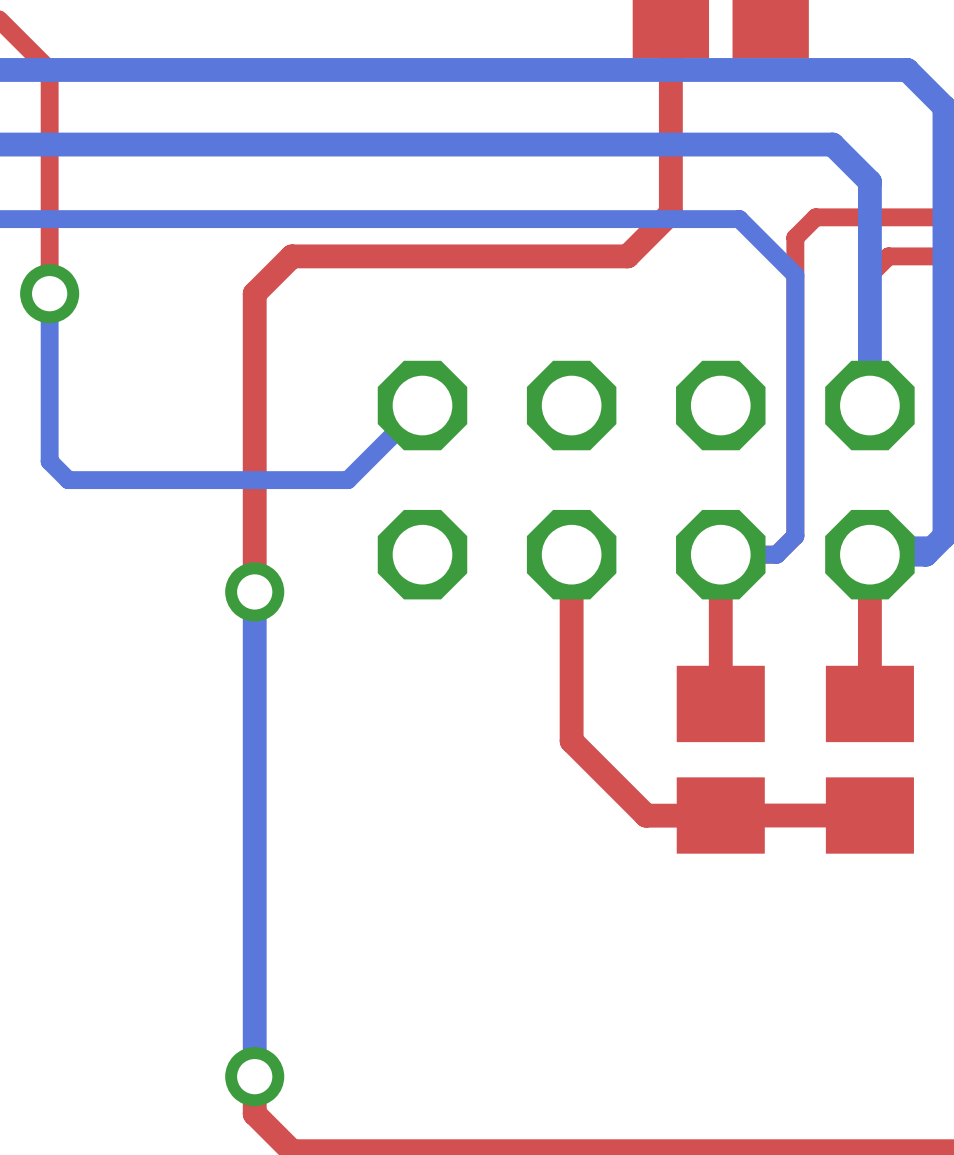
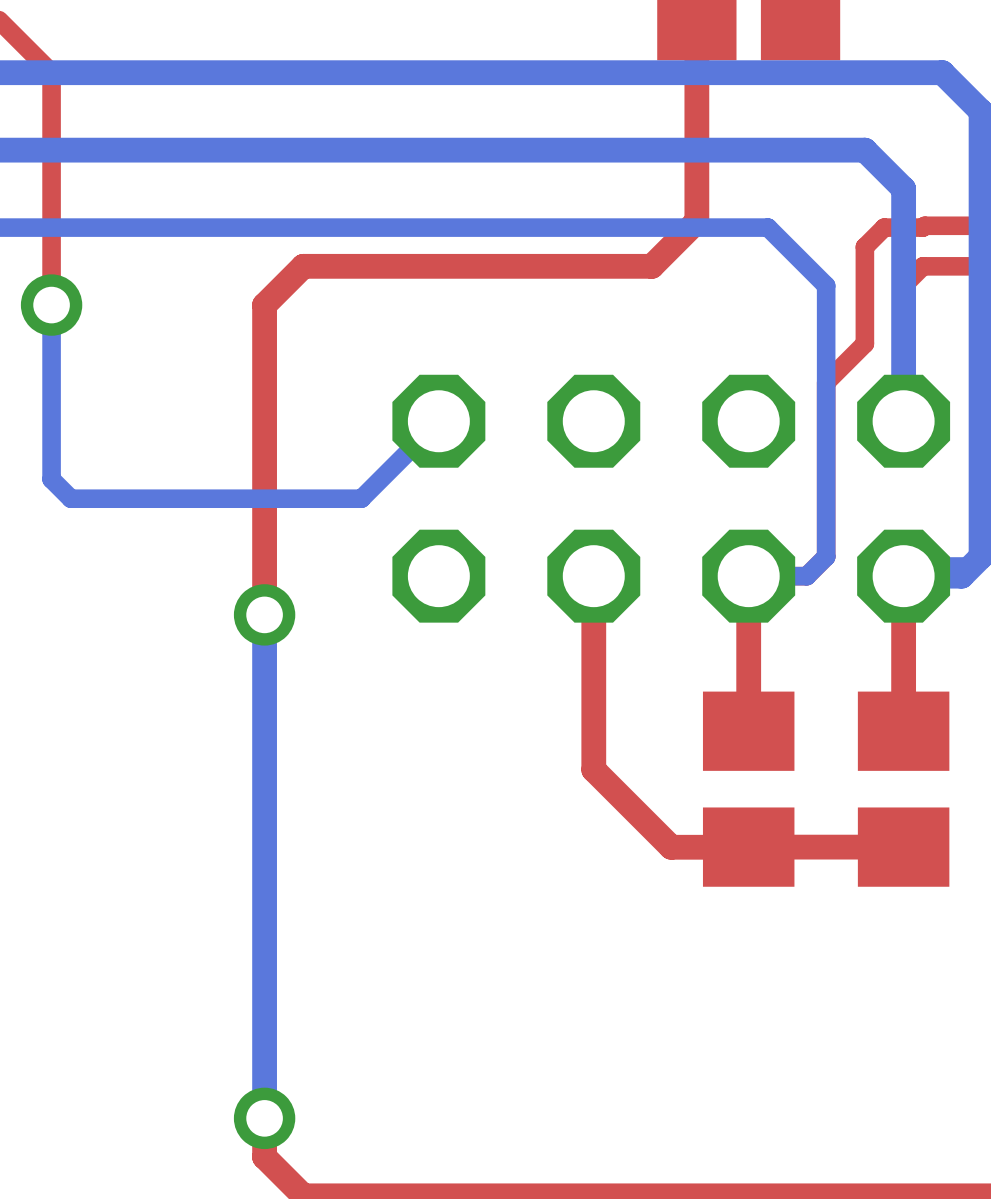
top track: (890, 217) (815, 217) (795, 237) (795, 368) -> (924, 225) (922, 227) (884, 227) (864, 246) (864, 343) (826, 382)

